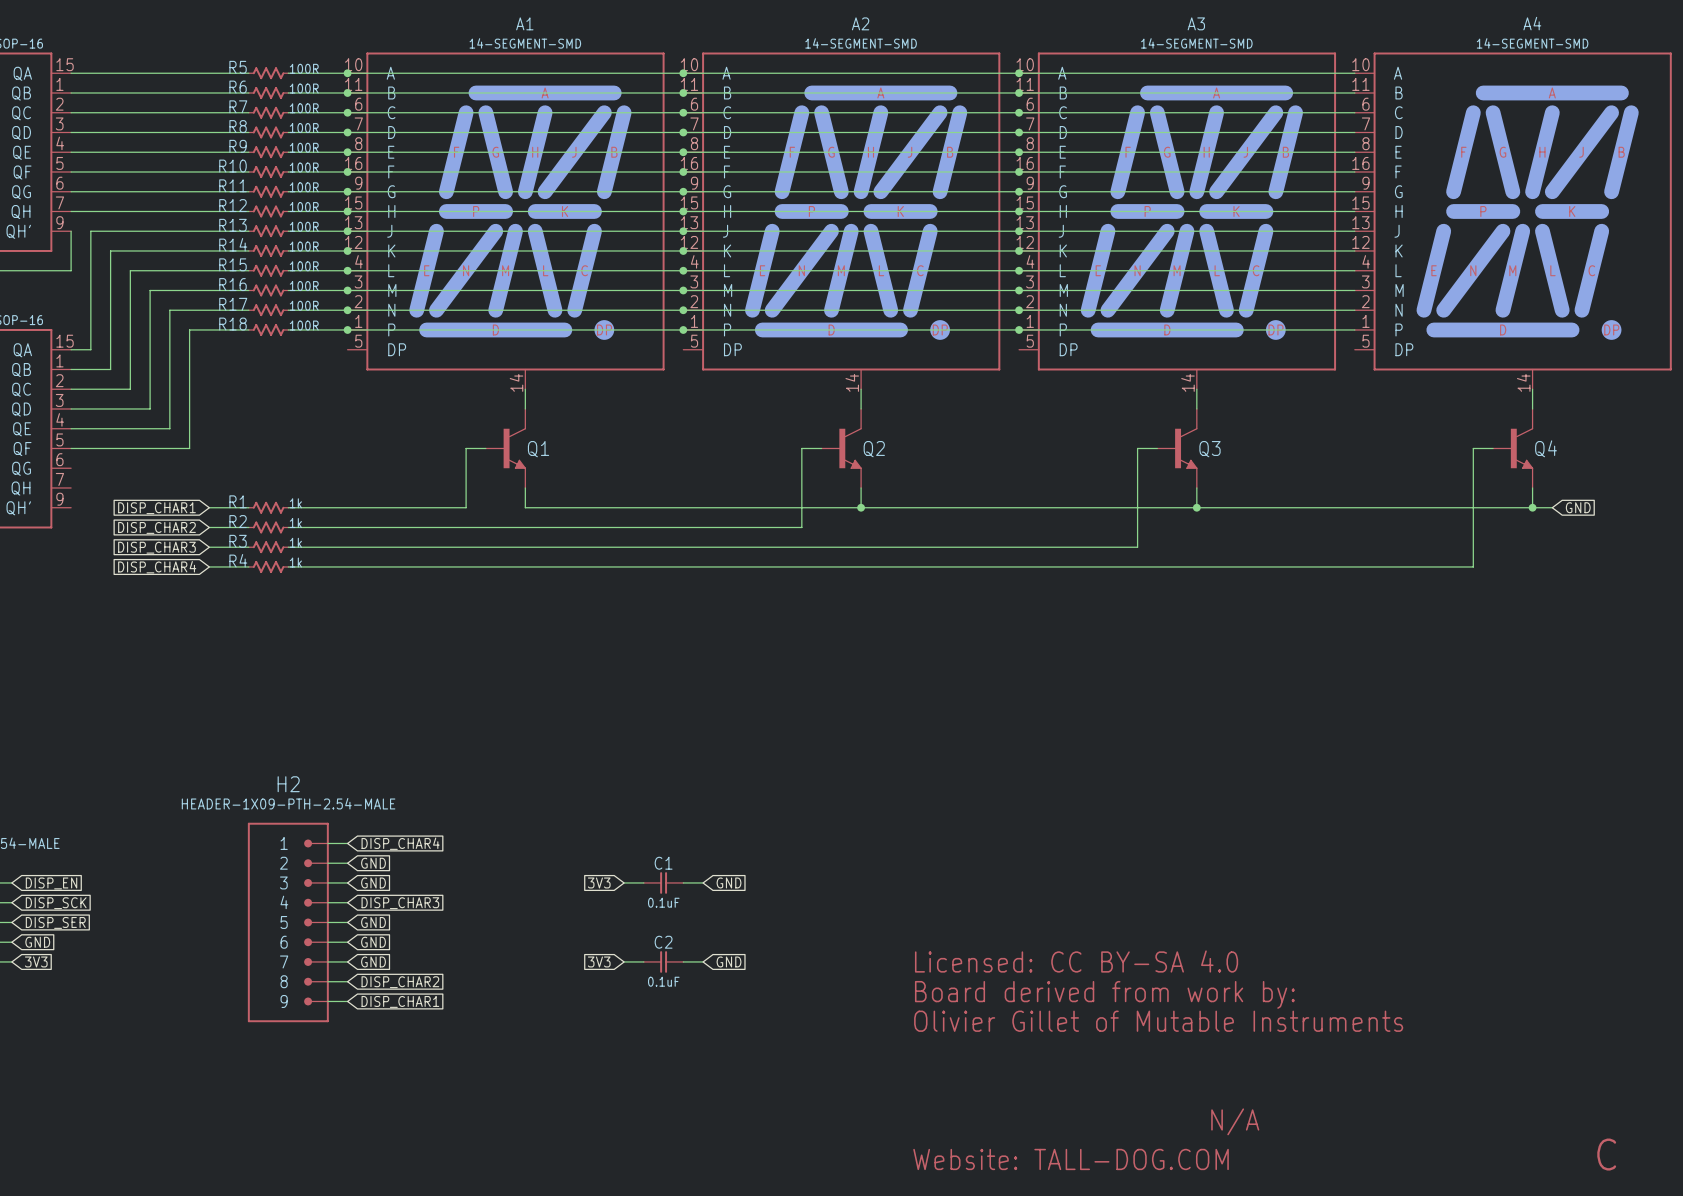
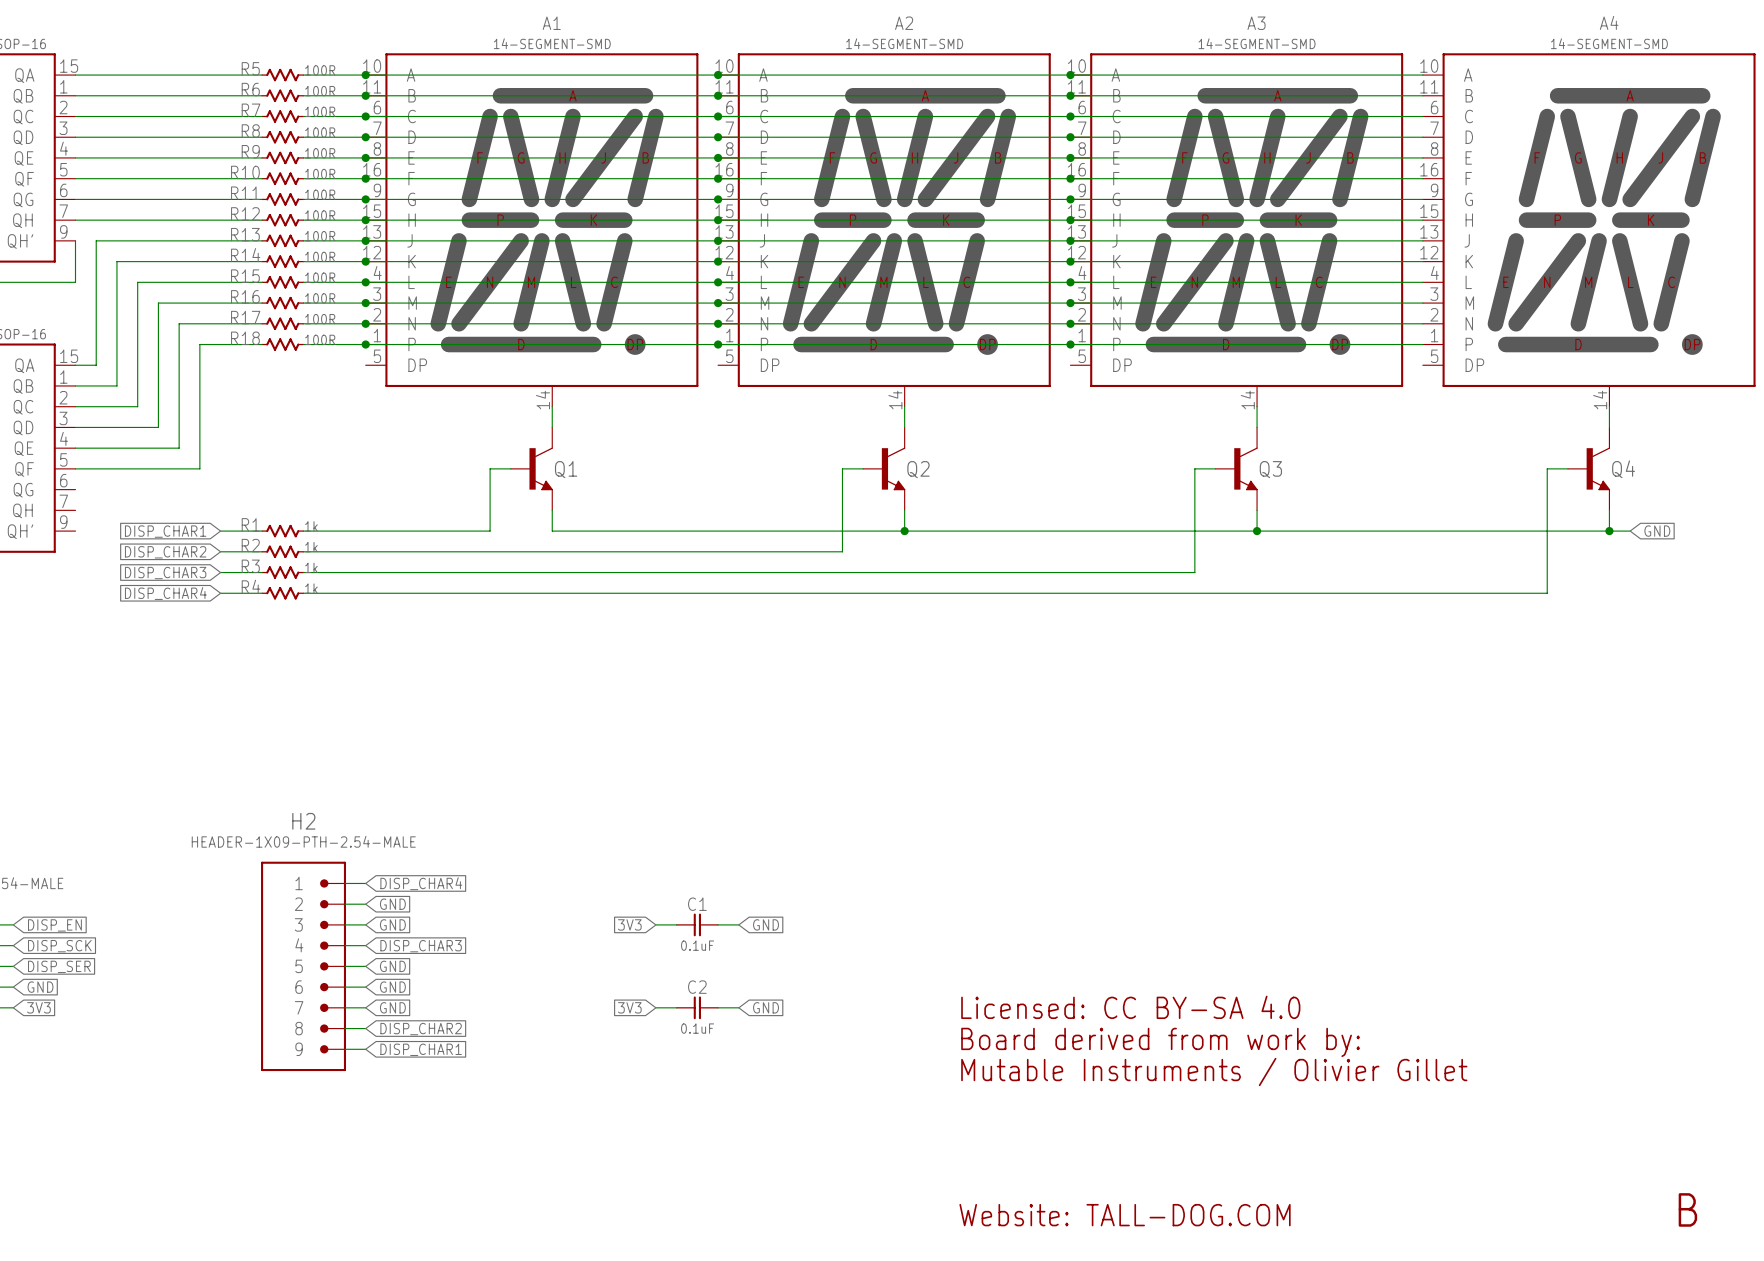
text: Olivier Gillet of Mutable Instruments (1158, 1021) -> Mutable Instruments / Olivier Gillet (1214, 1072)
text: N/A (1235, 1121) -> none
text: C (1606, 1154) -> B (1687, 1209)

